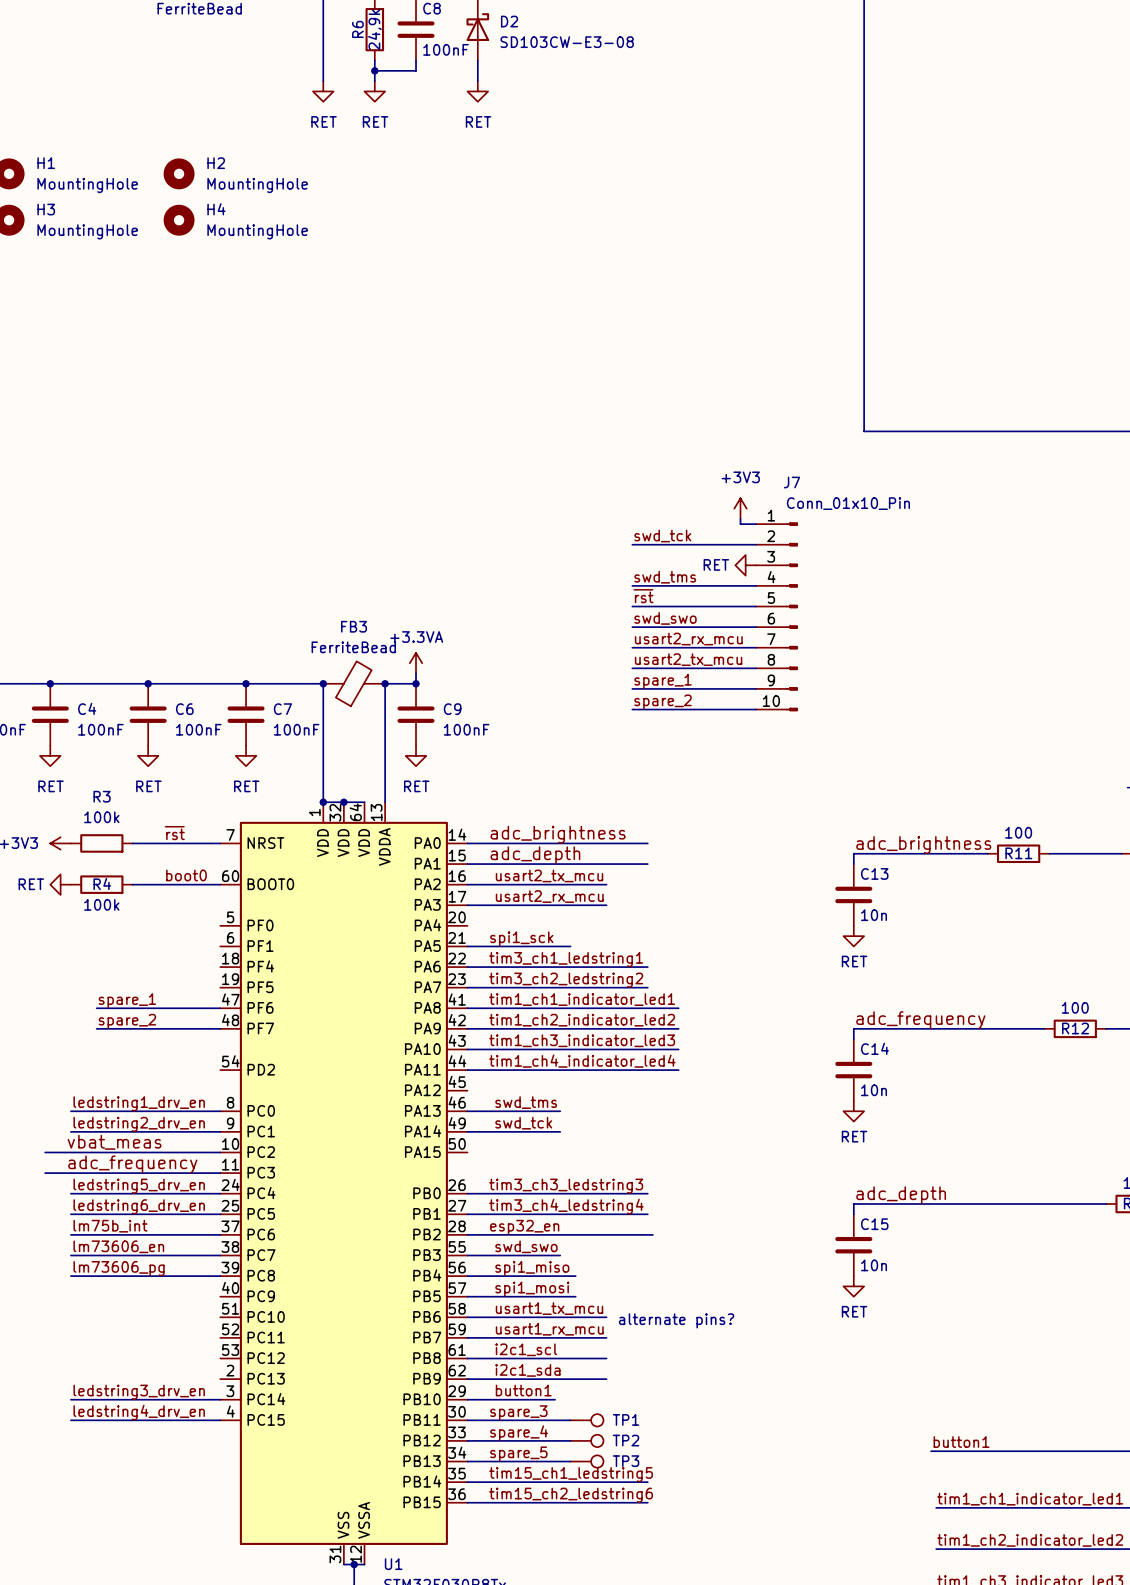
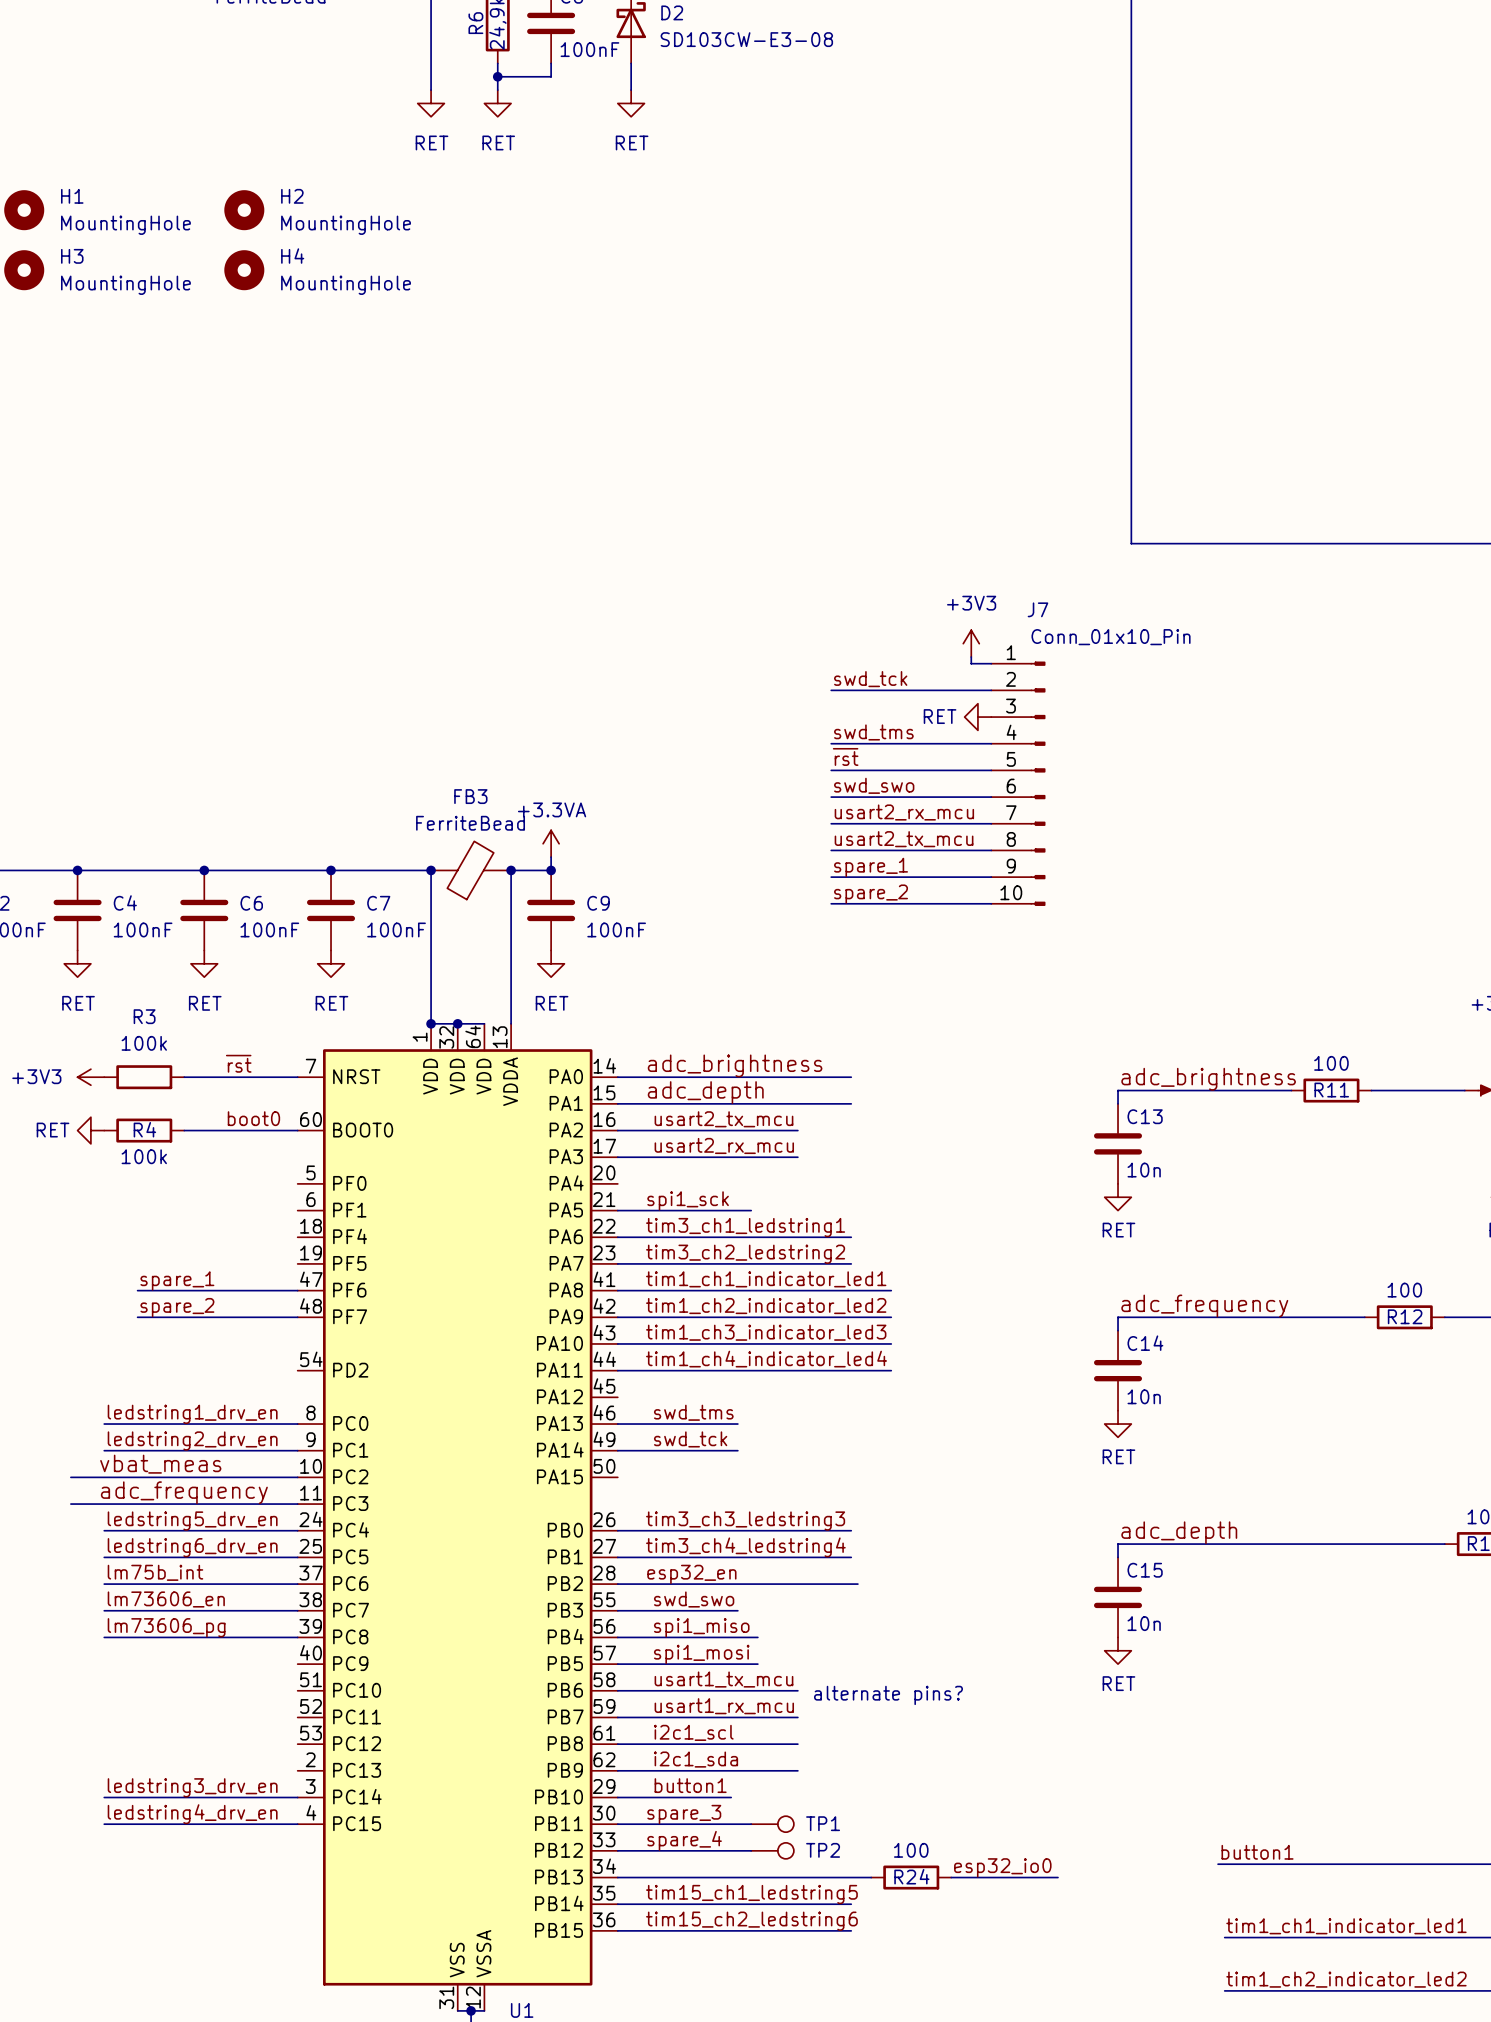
label: spare_5 (518, 1454) -> none
label: none -> esp32_io0 (1002, 1867)
wire: none -> (751, 1877) (871, 1877)
TP3: (587, 1461) -> none
R24: none -> 100 (911, 1877)
wire: none -> (951, 1877) (1057, 1877)

